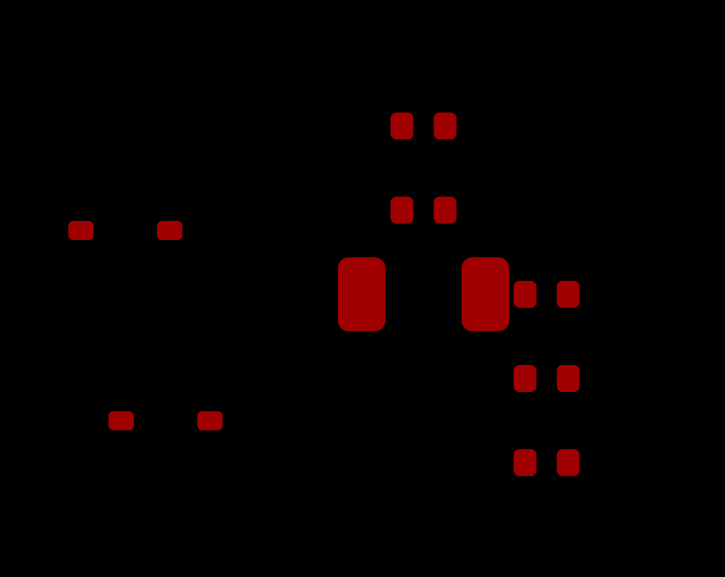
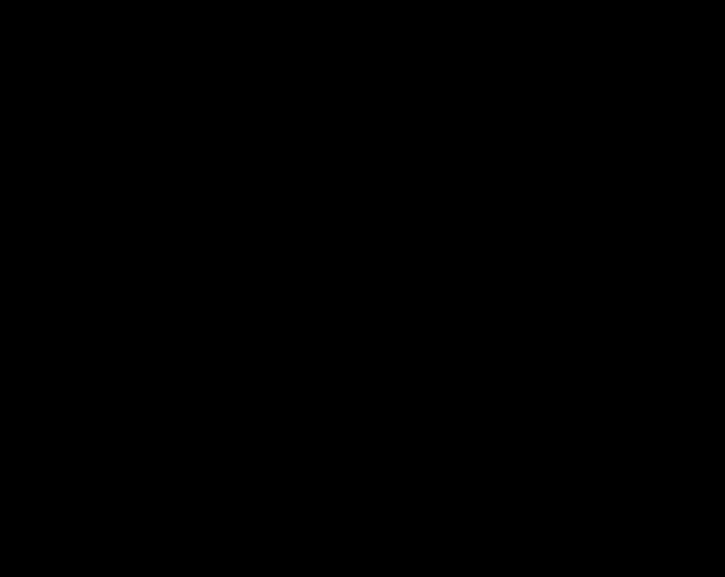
part: (423, 125) -> none
part: (423, 210) -> none
part: (125, 230) -> none
part: (423, 294) -> none
part: (546, 294) -> none
part: (546, 378) -> none
part: (165, 420) -> none
part: (546, 462) -> none

